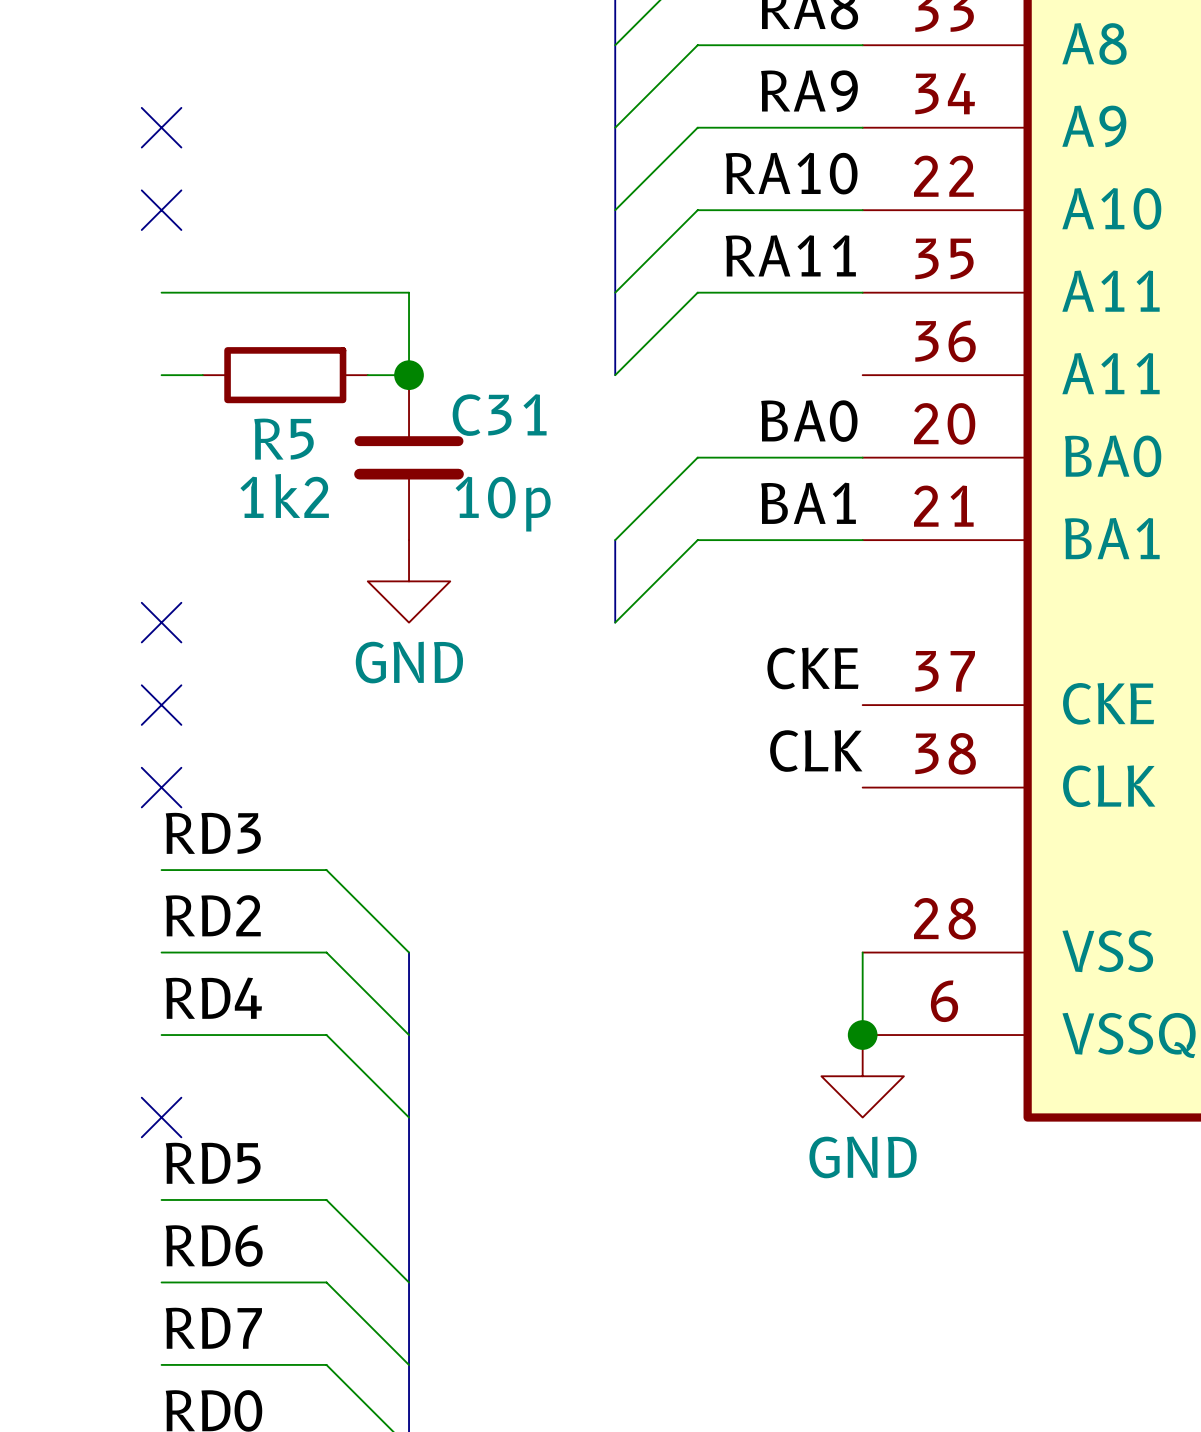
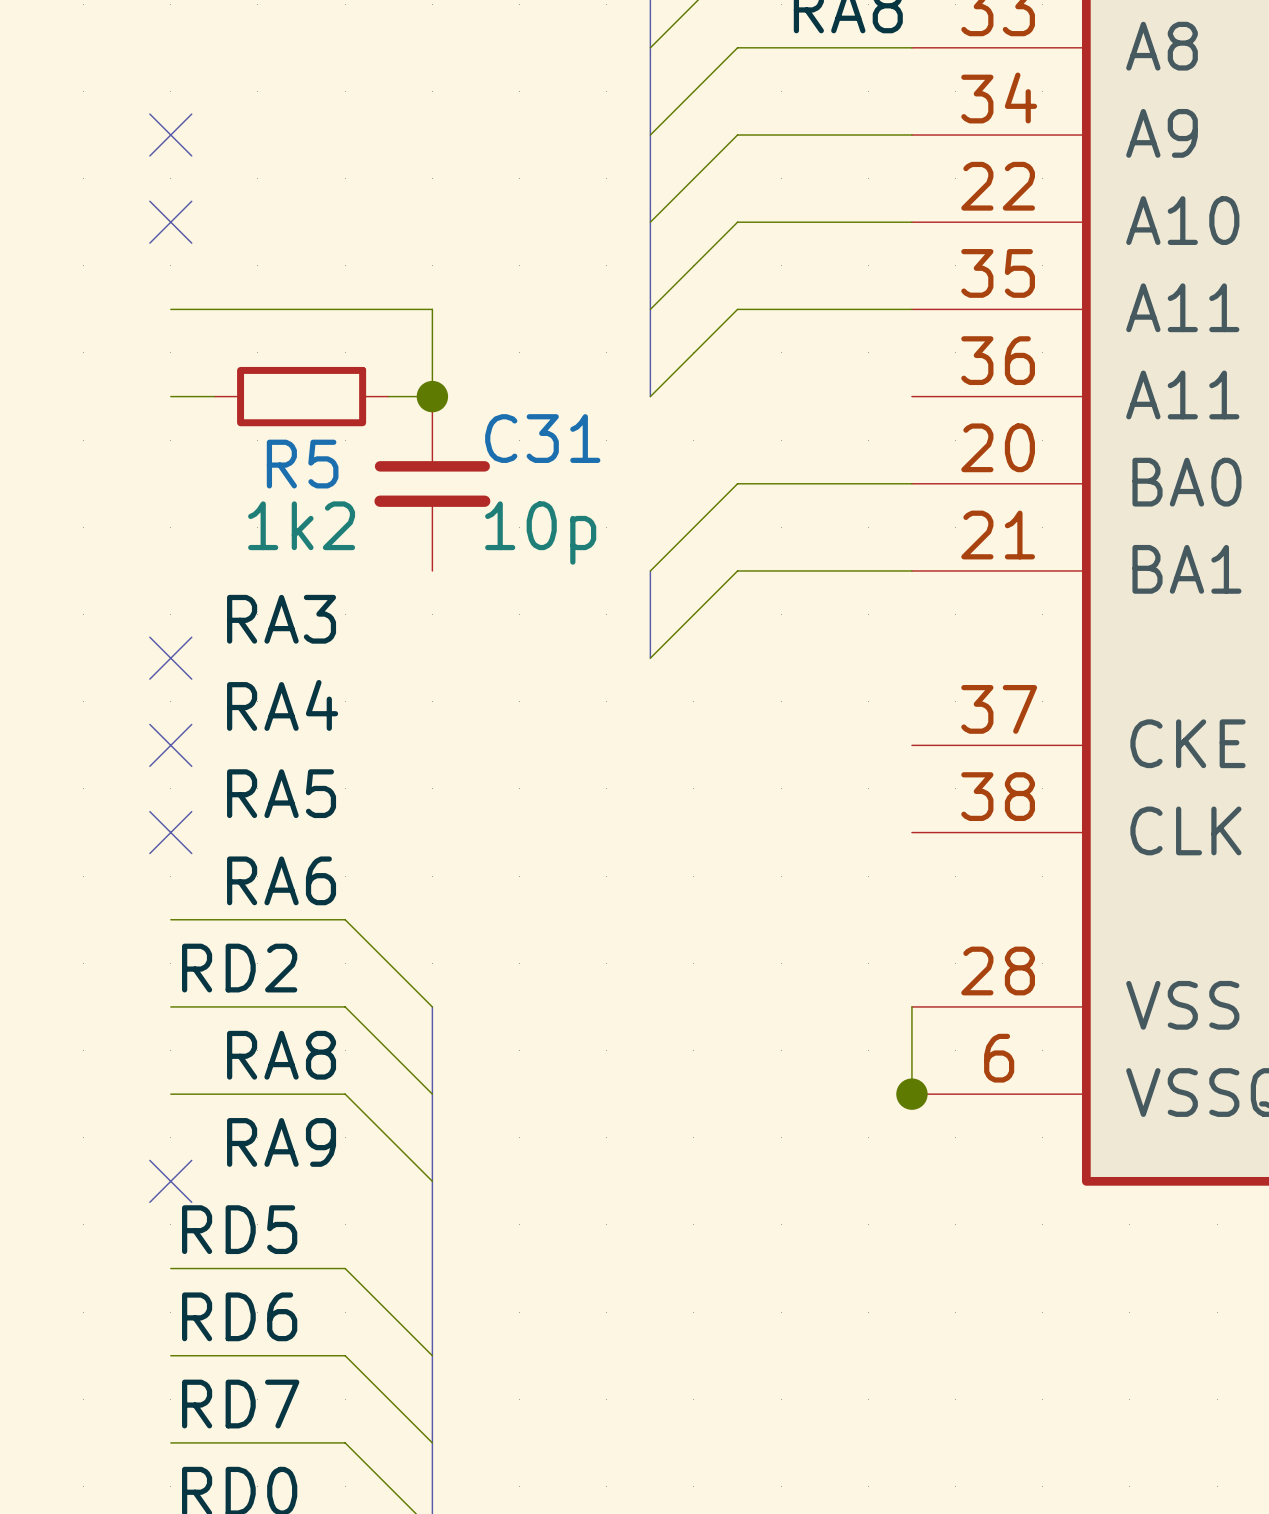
label: RA9 (809, 91) -> none
label: RA10 (791, 173) -> none
label: RA11 (790, 255) -> none
label: BA0 (809, 421) -> none
label: BA1 (808, 503) -> none
power symbol: GND (409, 581) -> none
label: none -> RA3 (281, 619)
label: none -> RA4 (282, 705)
label: CKE (812, 668) -> none
label: none -> RA5 (281, 793)
label: CLK (816, 751) -> none
label: RD3 (213, 833) -> none
label: none -> RA6 (281, 880)
label: RD4 (213, 998) -> none
label: none -> RA8 (281, 1055)
power symbol: GND (862, 1076) -> none
label: none -> RA9 (281, 1142)

